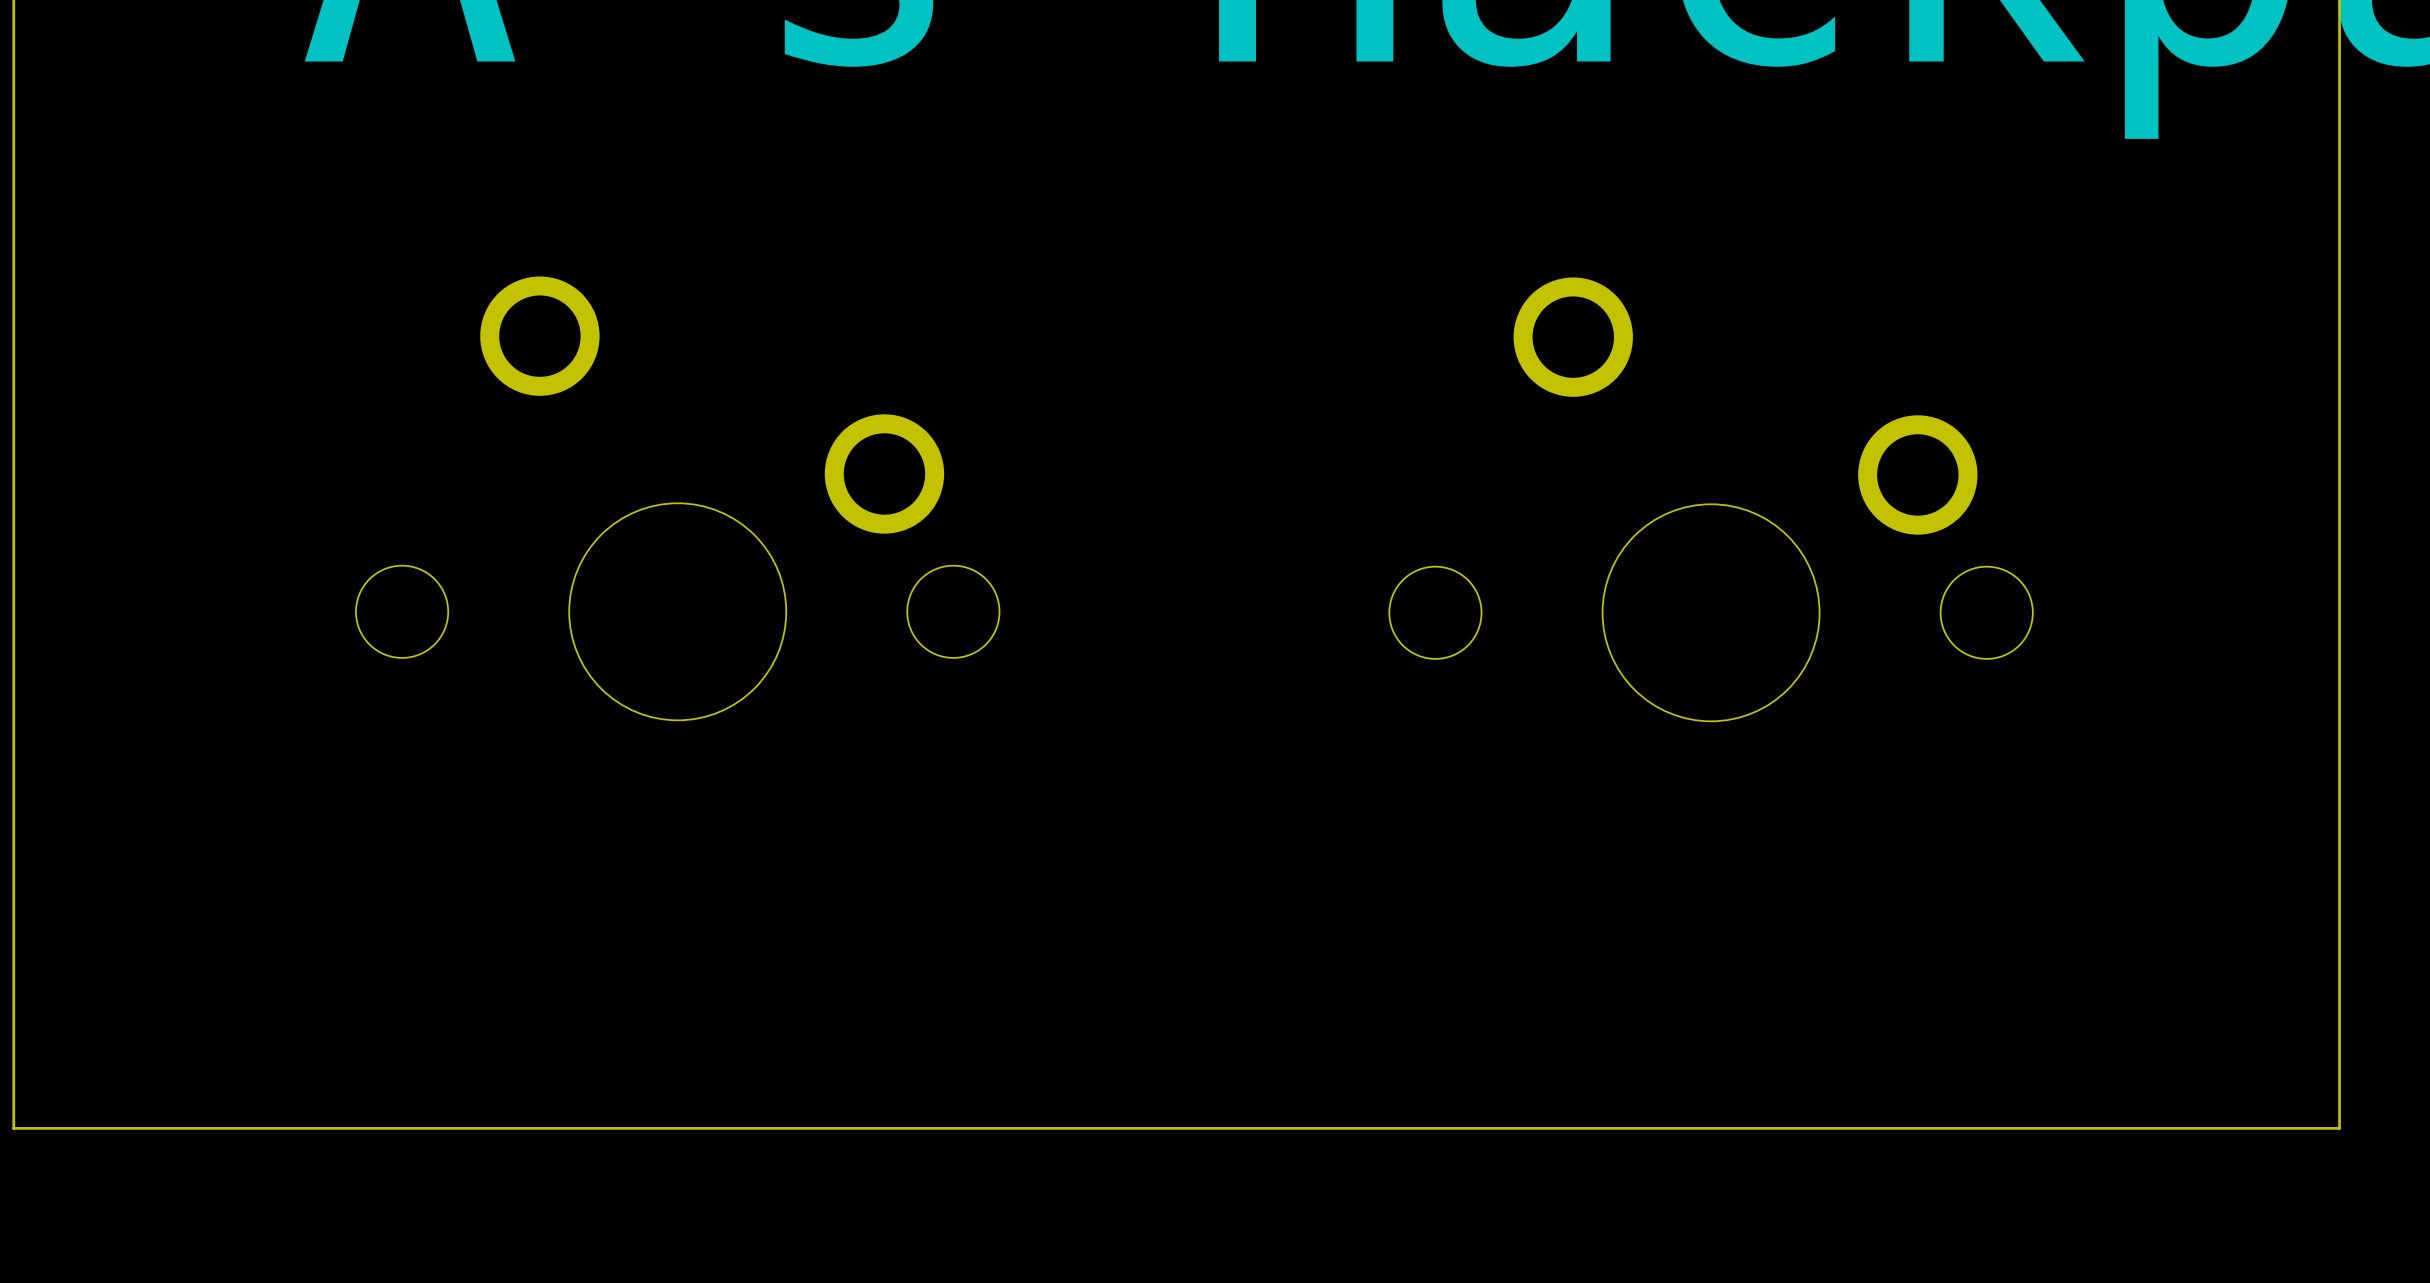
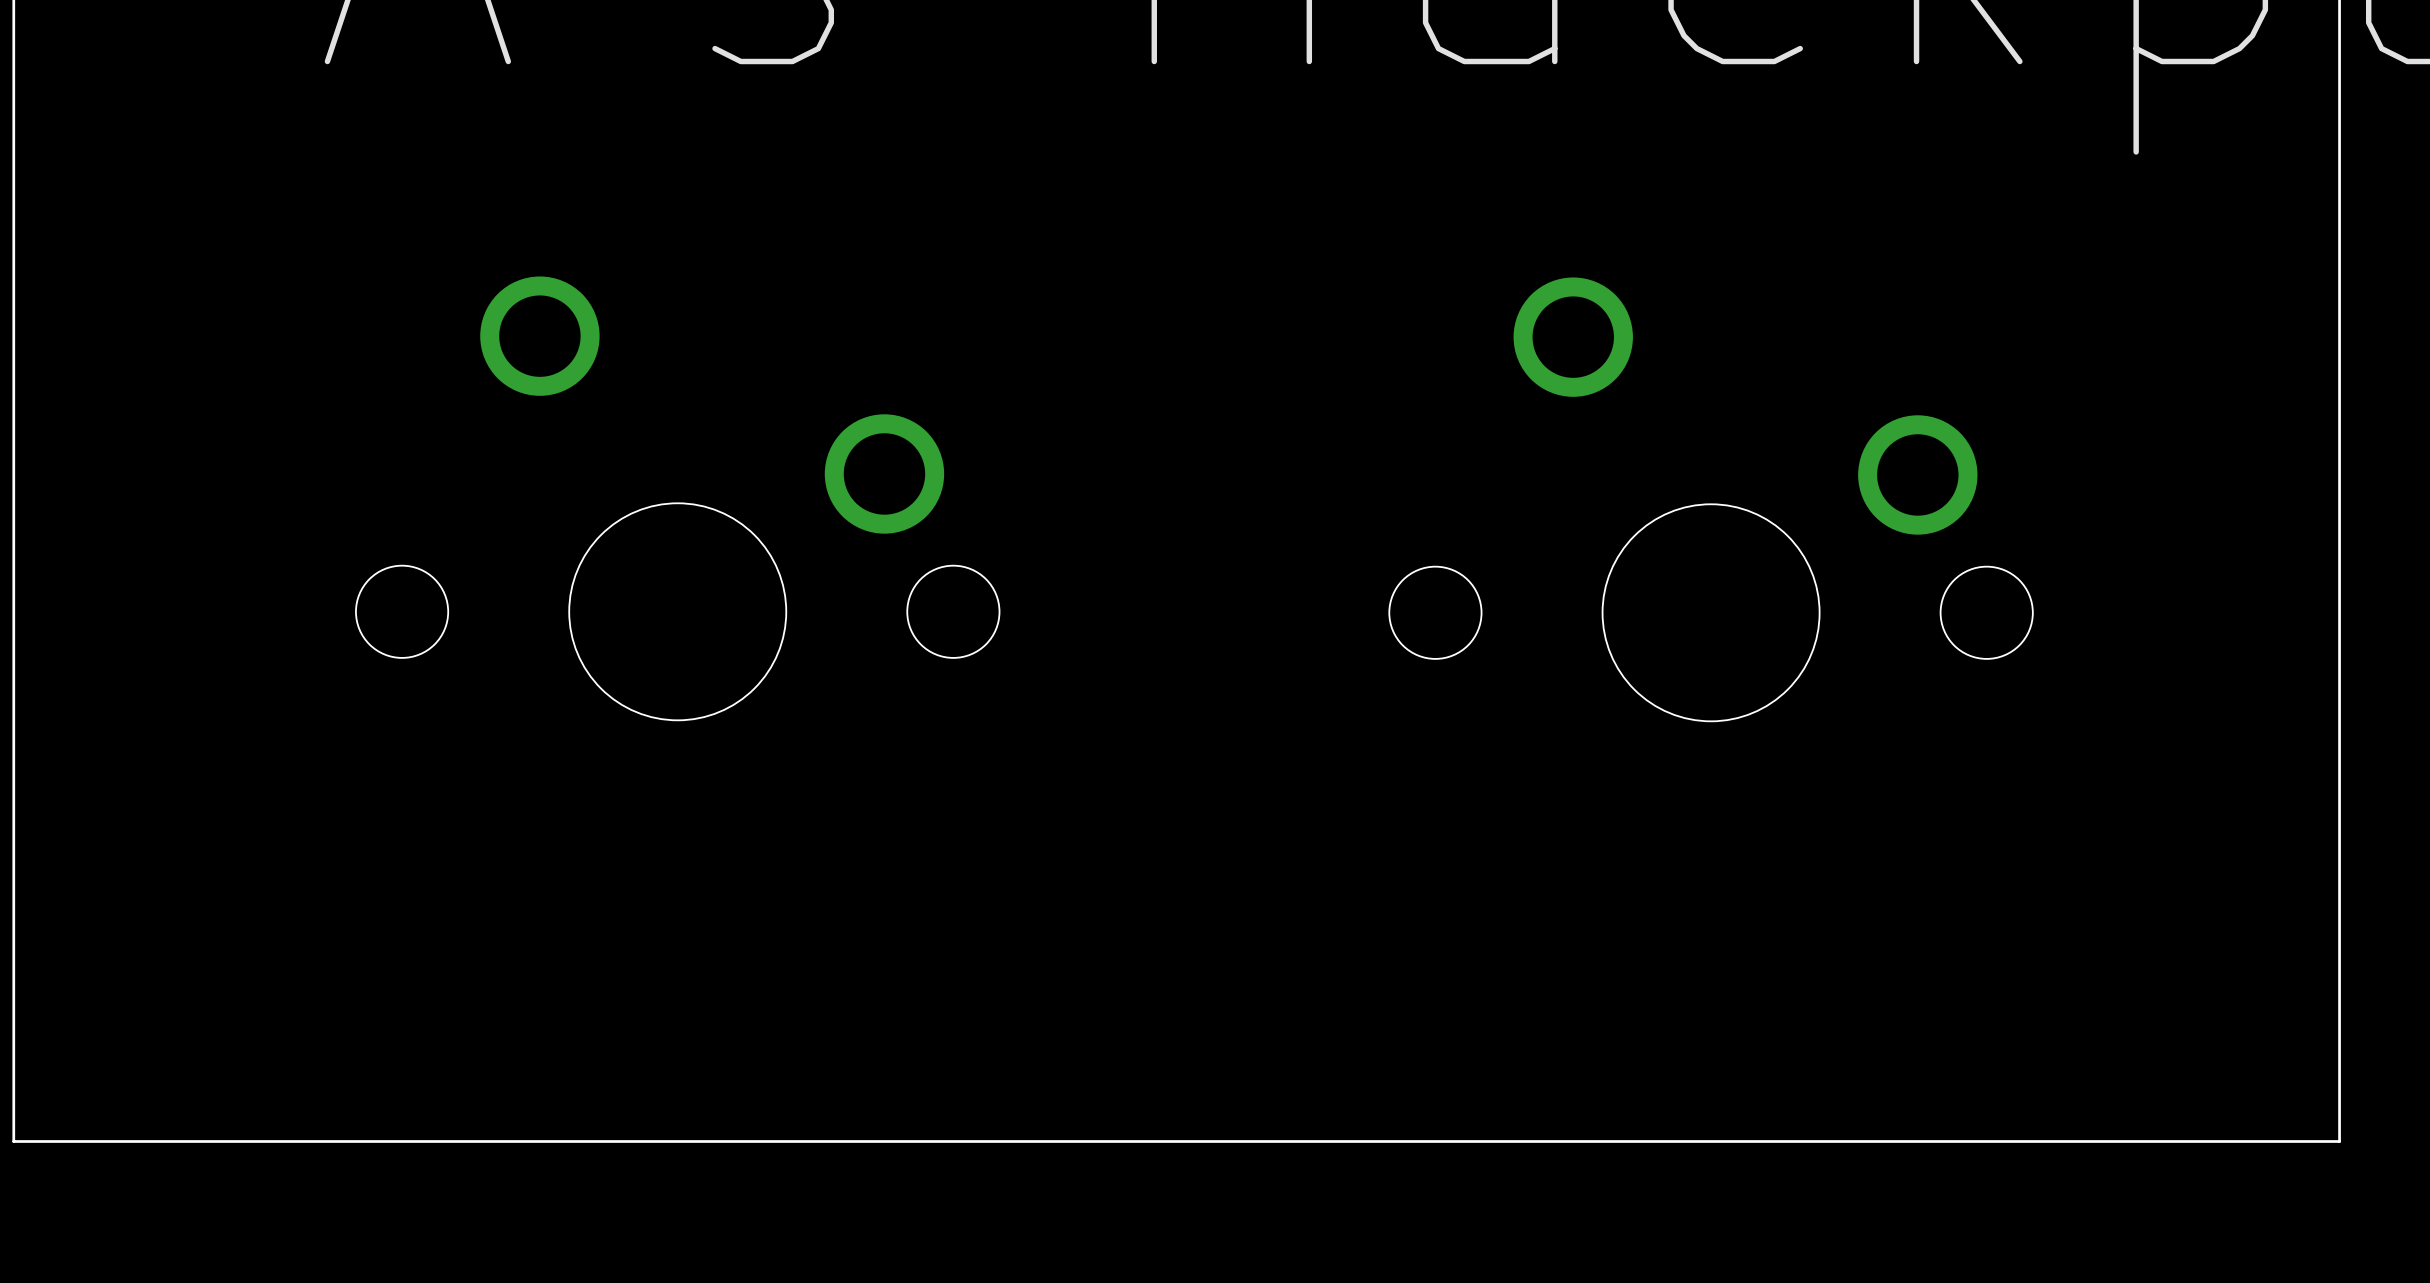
board edge: (2339, 1128) (13, 1128) -> (2339, 1128) (2339, 1141) (13, 1141) (13, 1128)

